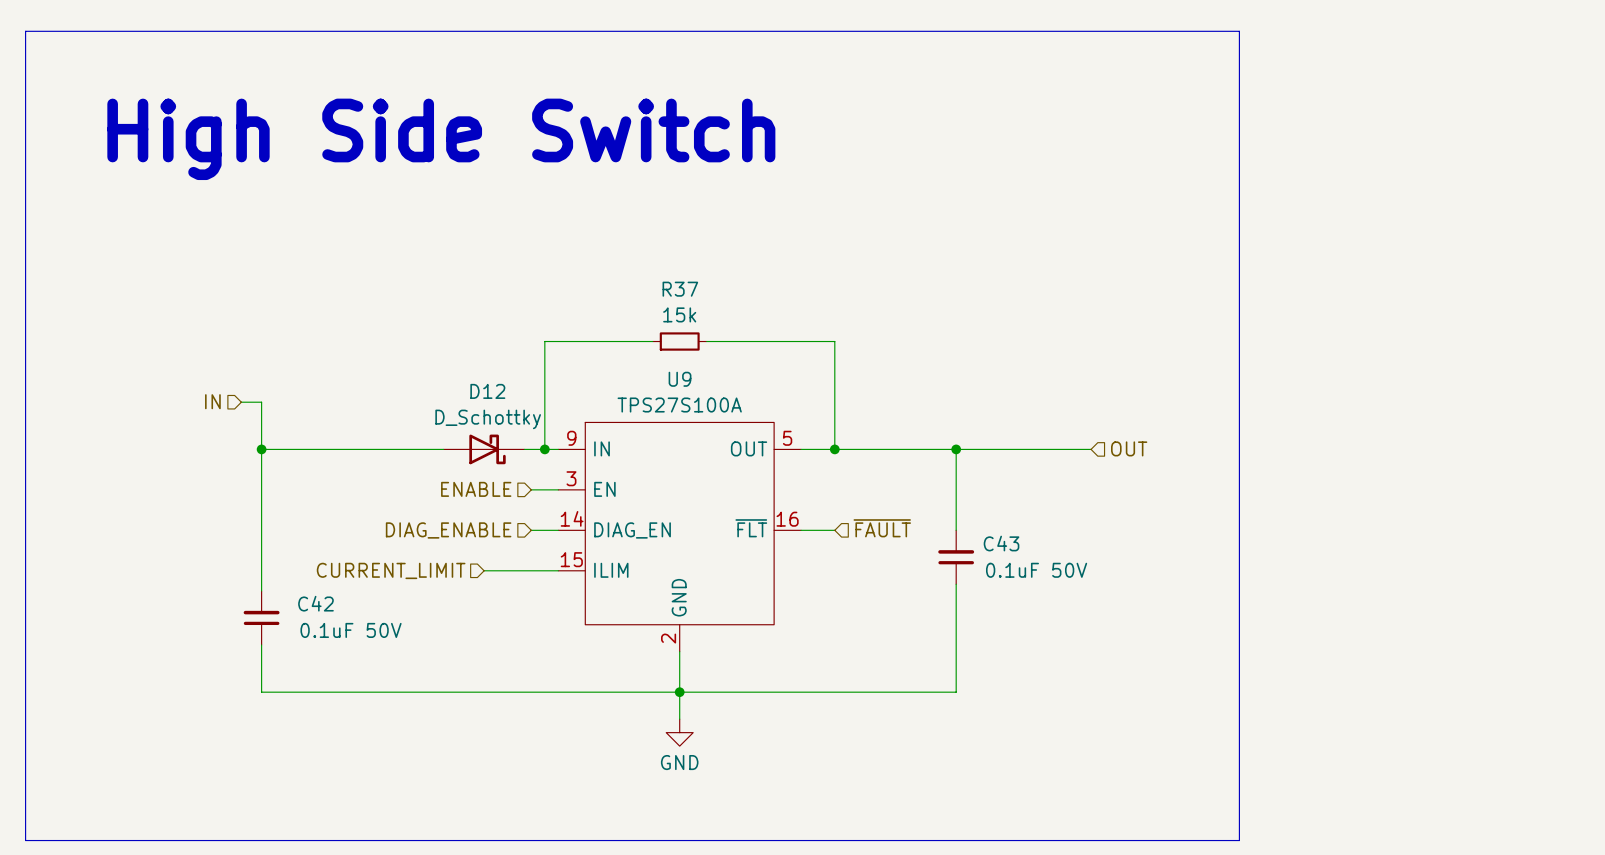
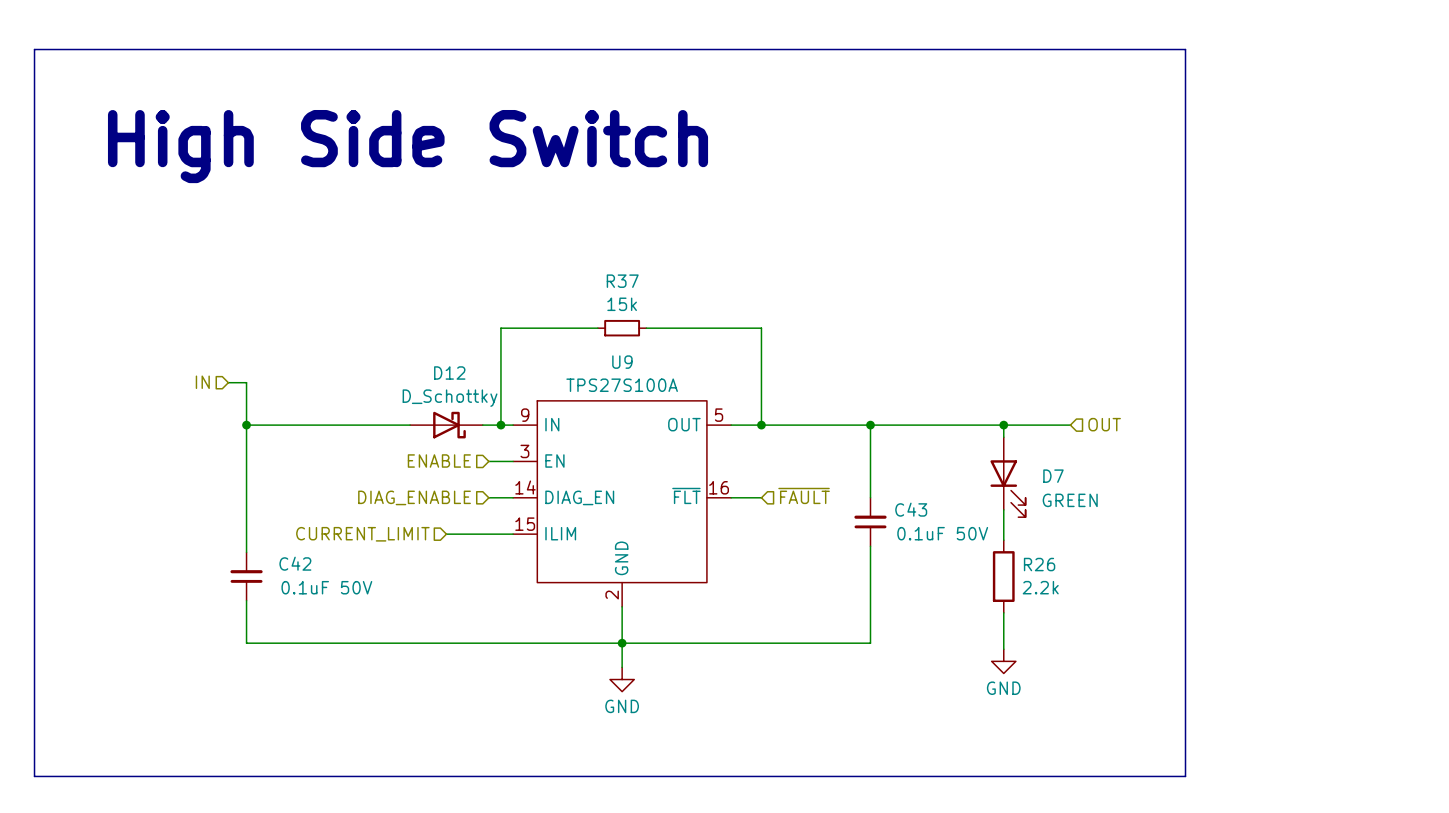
line: (1239, 31) (1239, 840) -> (1124, 49) (1185, 49) (1185, 776) (1124, 776)
hierarchical label position: OUT (1129, 448) -> OUT (1104, 424)
wire: none -> (991, 425) (1070, 425)
junction: none -> (1003, 425)
D7: none -> GREEN (1008, 477)
wire: none -> (1003, 509) (1003, 540)
R26: none -> 2.2k (1003, 576)
wire: none -> (1003, 612) (1003, 649)
power symbol: none -> GND (1003, 661)

